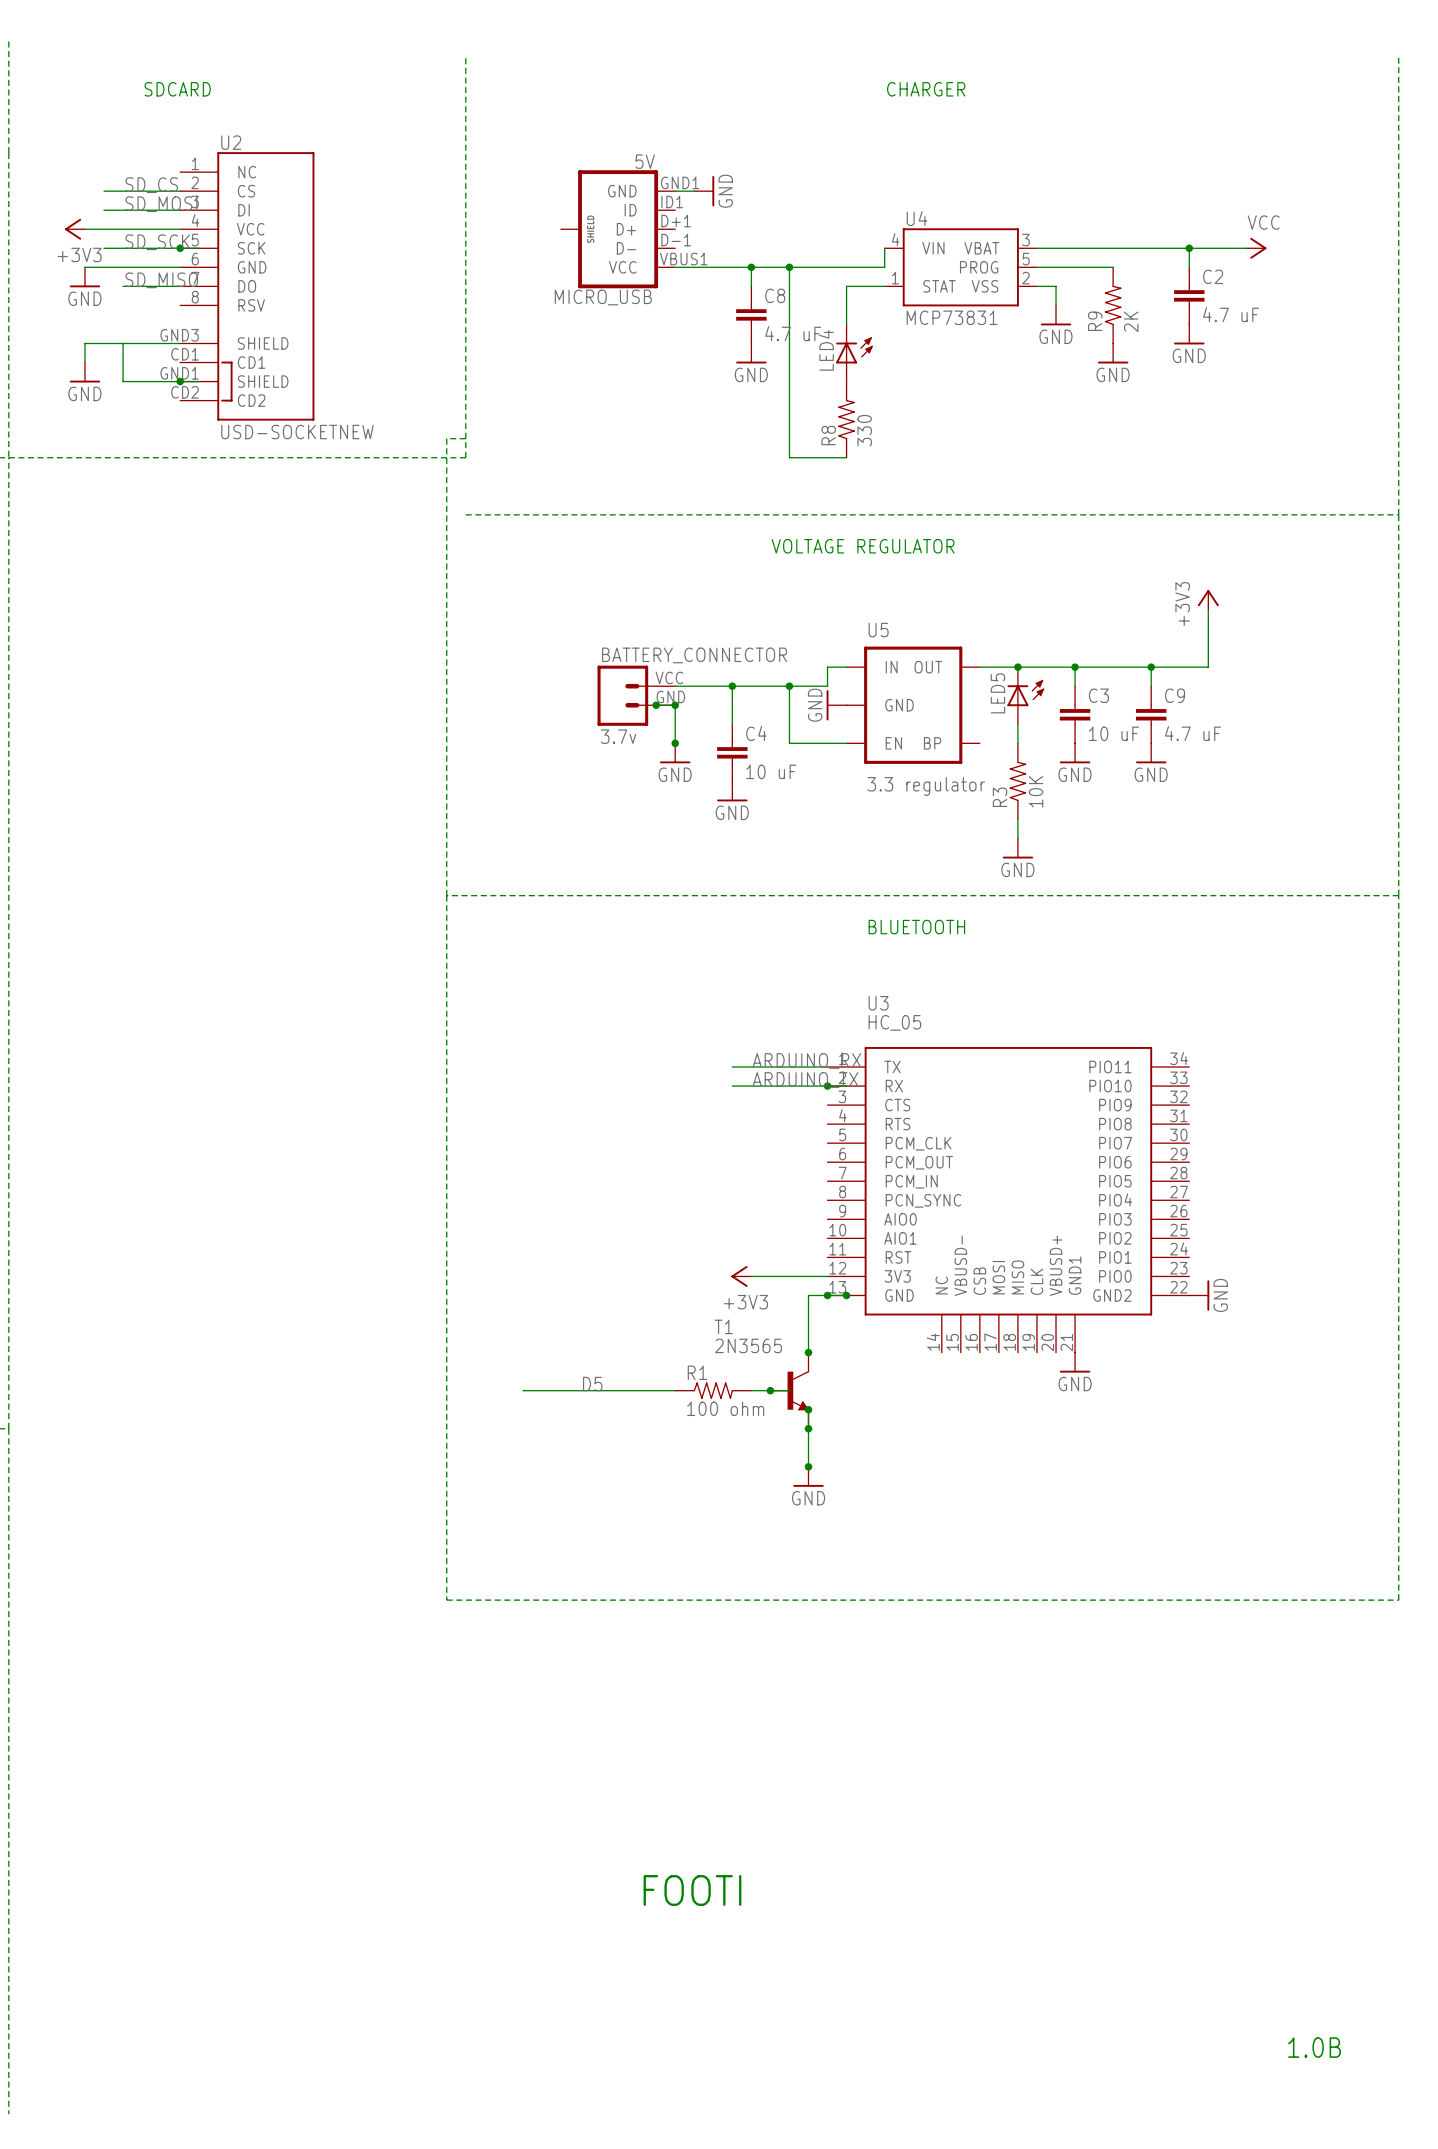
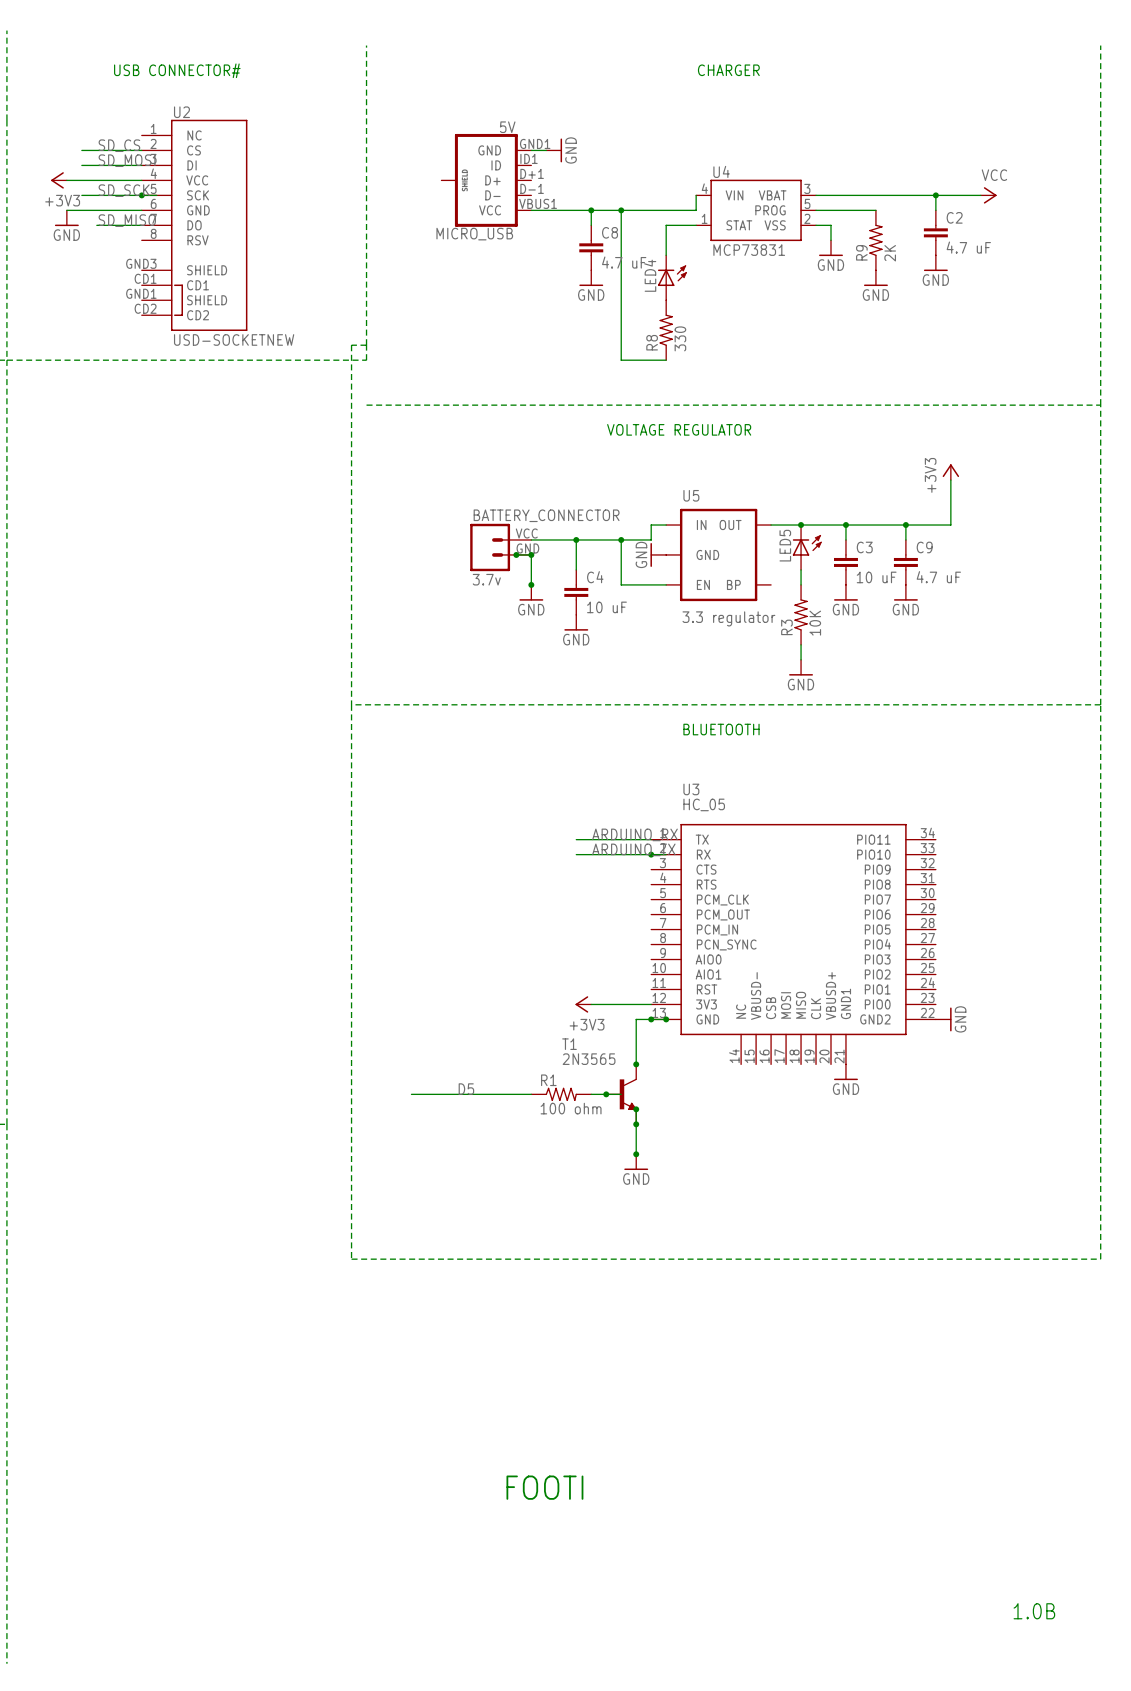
text: SDCARD (177, 89) -> USB CONNECTOR# (177, 70)
wire: (123, 343) (123, 381) (199, 381) -> none
wire: (180, 343) (84, 343) (84, 362) -> none
power symbol: GND (84, 372) -> none
junction: (180, 381) -> none

